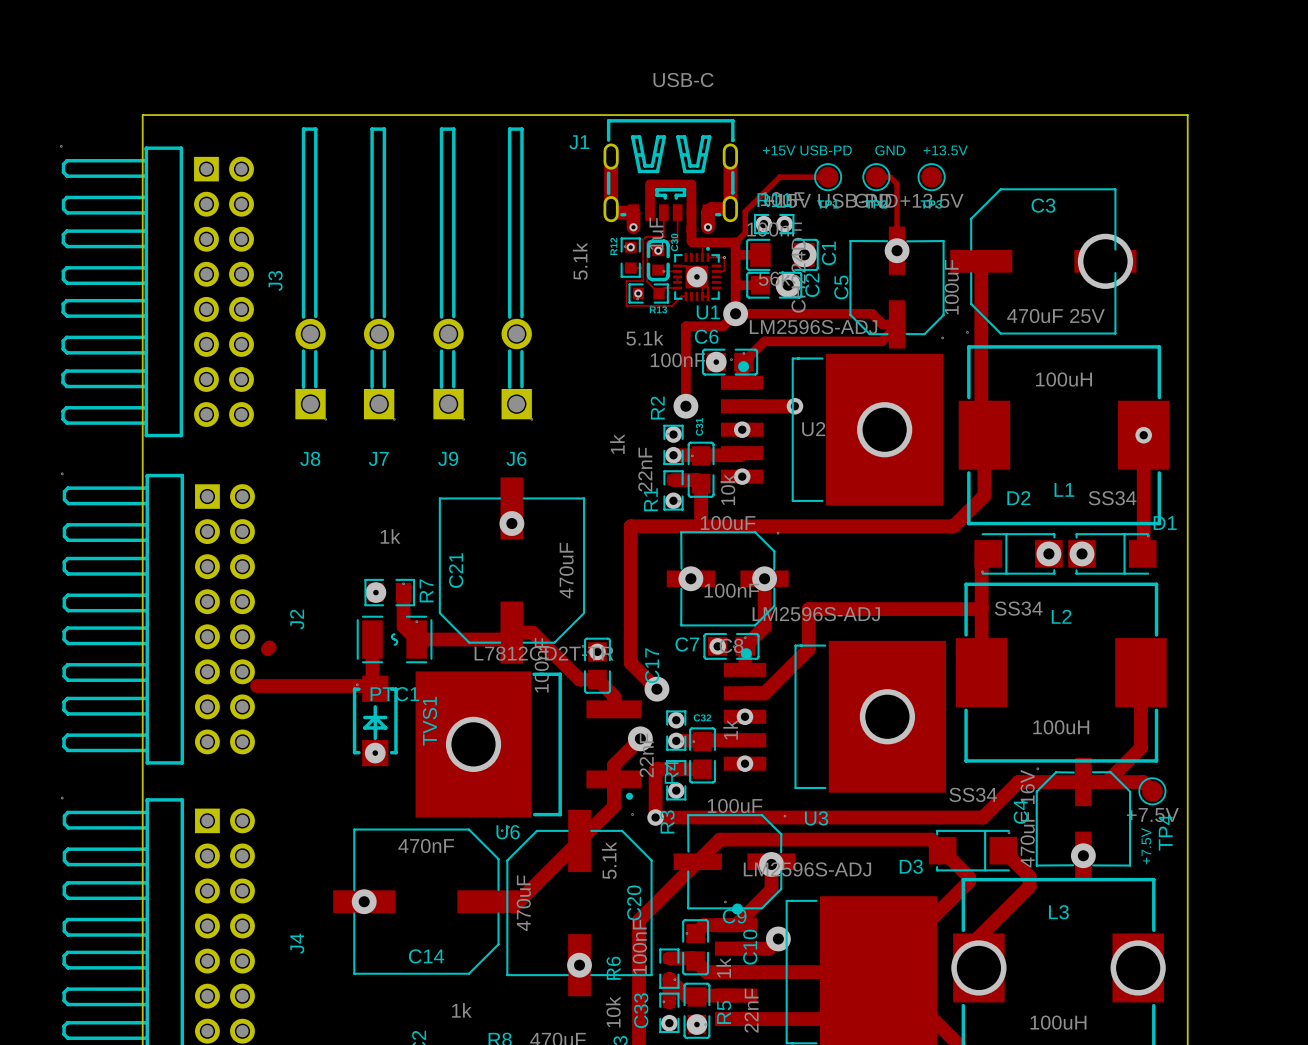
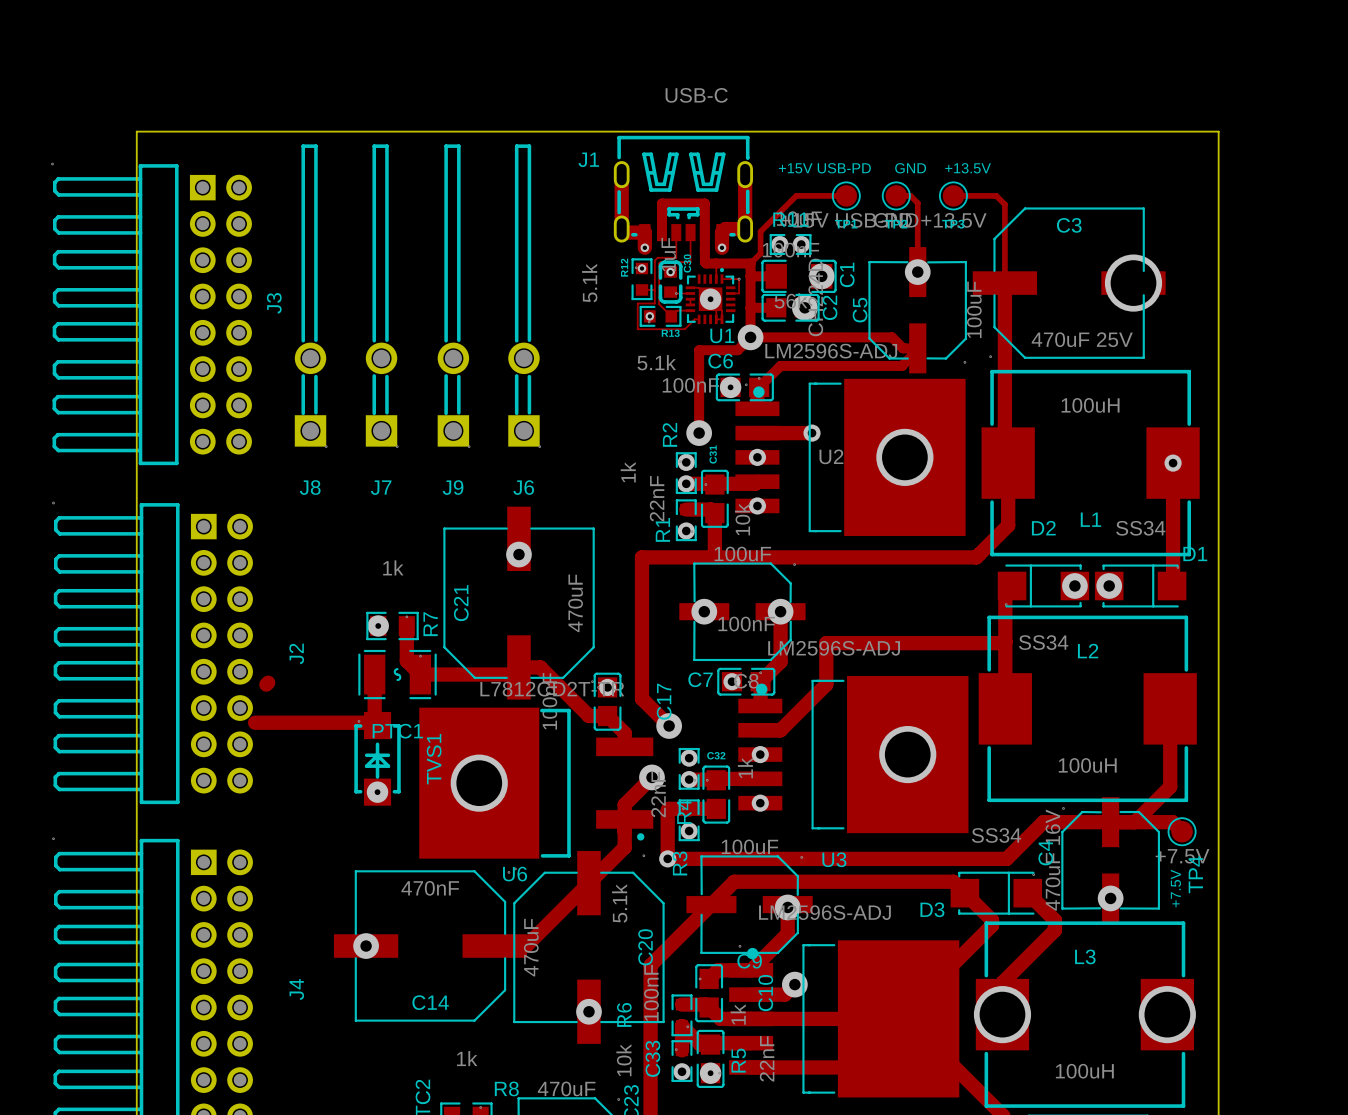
track: none -> (953, 195) (996, 195) (1004, 204) (1004, 283)

